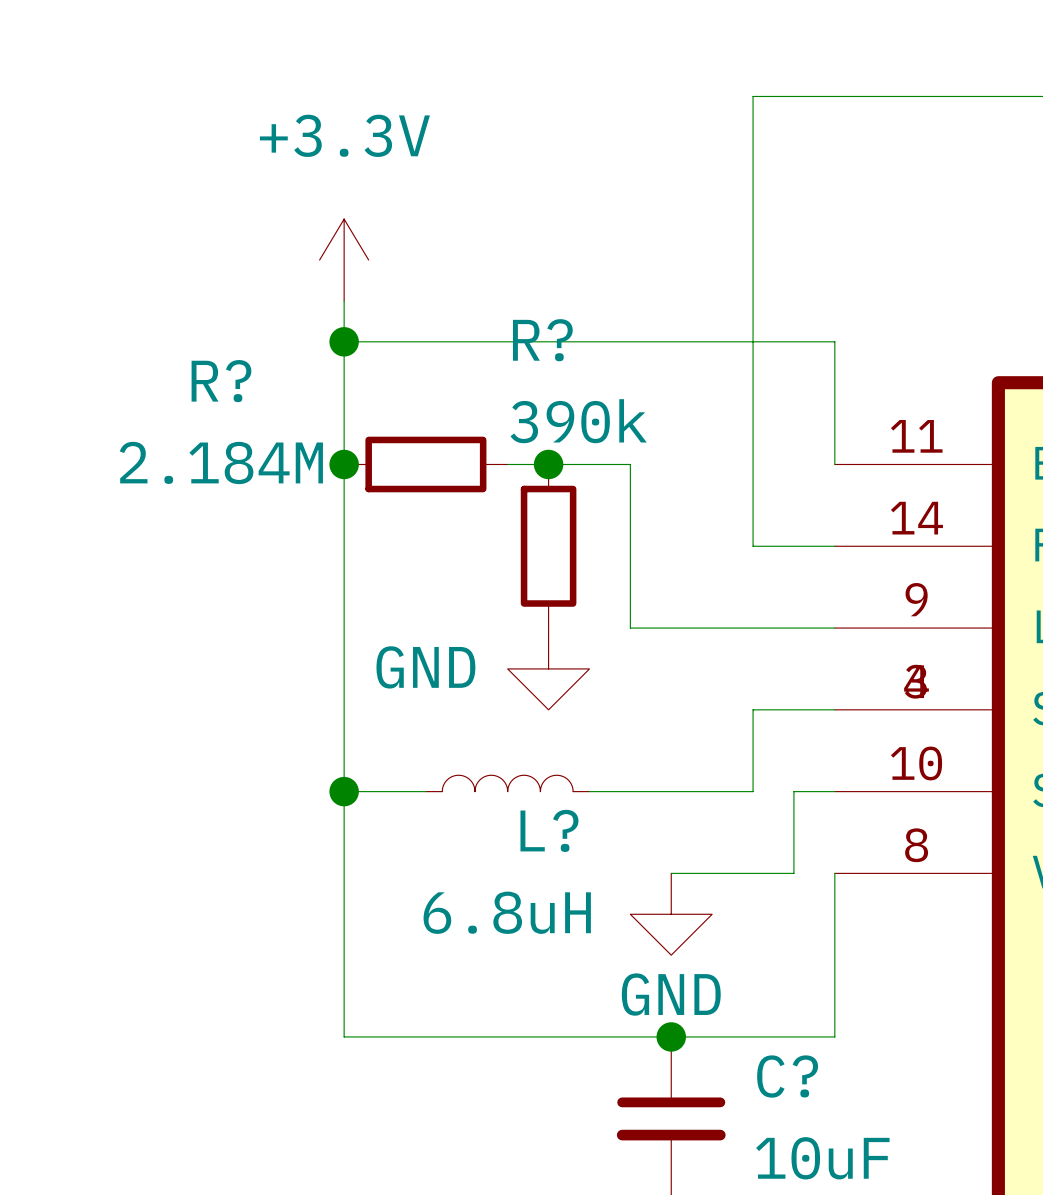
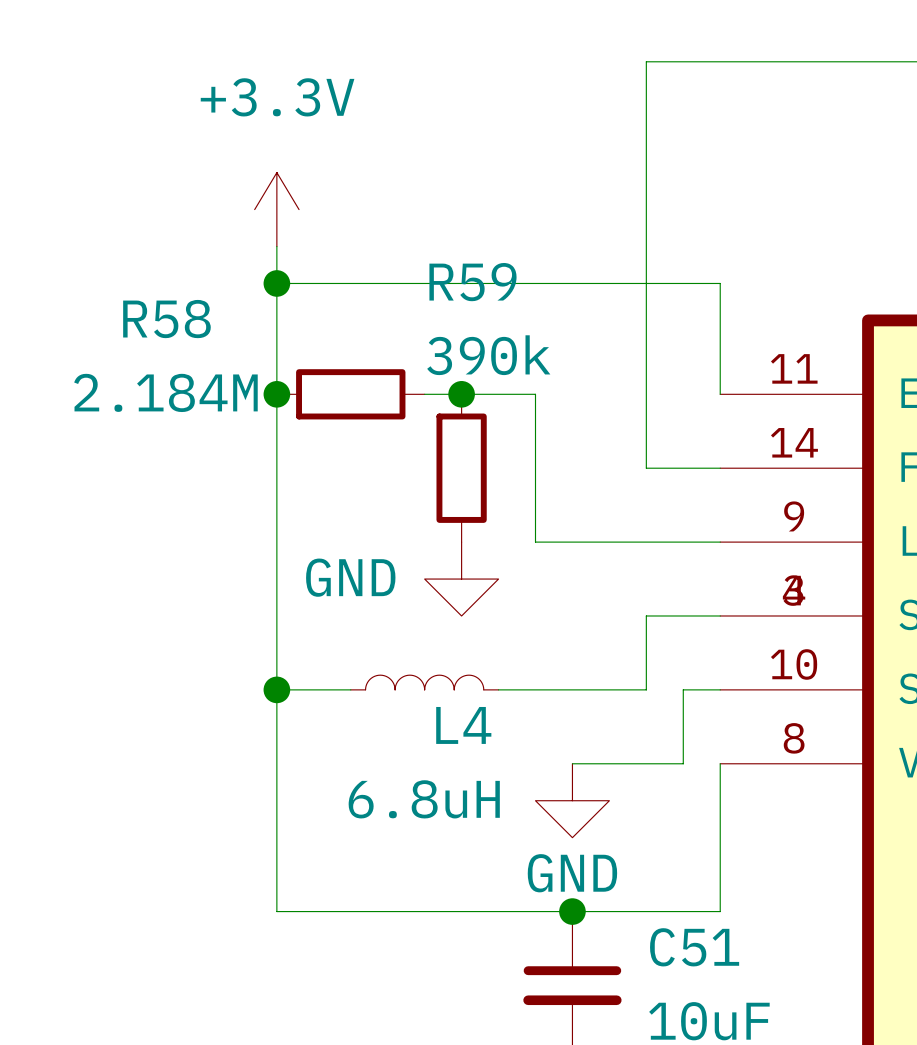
R? name: R? (542, 340) -> R59 (472, 282)
R? name: R? (221, 381) -> R58 (166, 319)
L?: 6.8uH (507, 783) -> none
L4: none -> 6.8uH (424, 682)
C? name: C? (787, 1076) -> C51 (694, 947)

